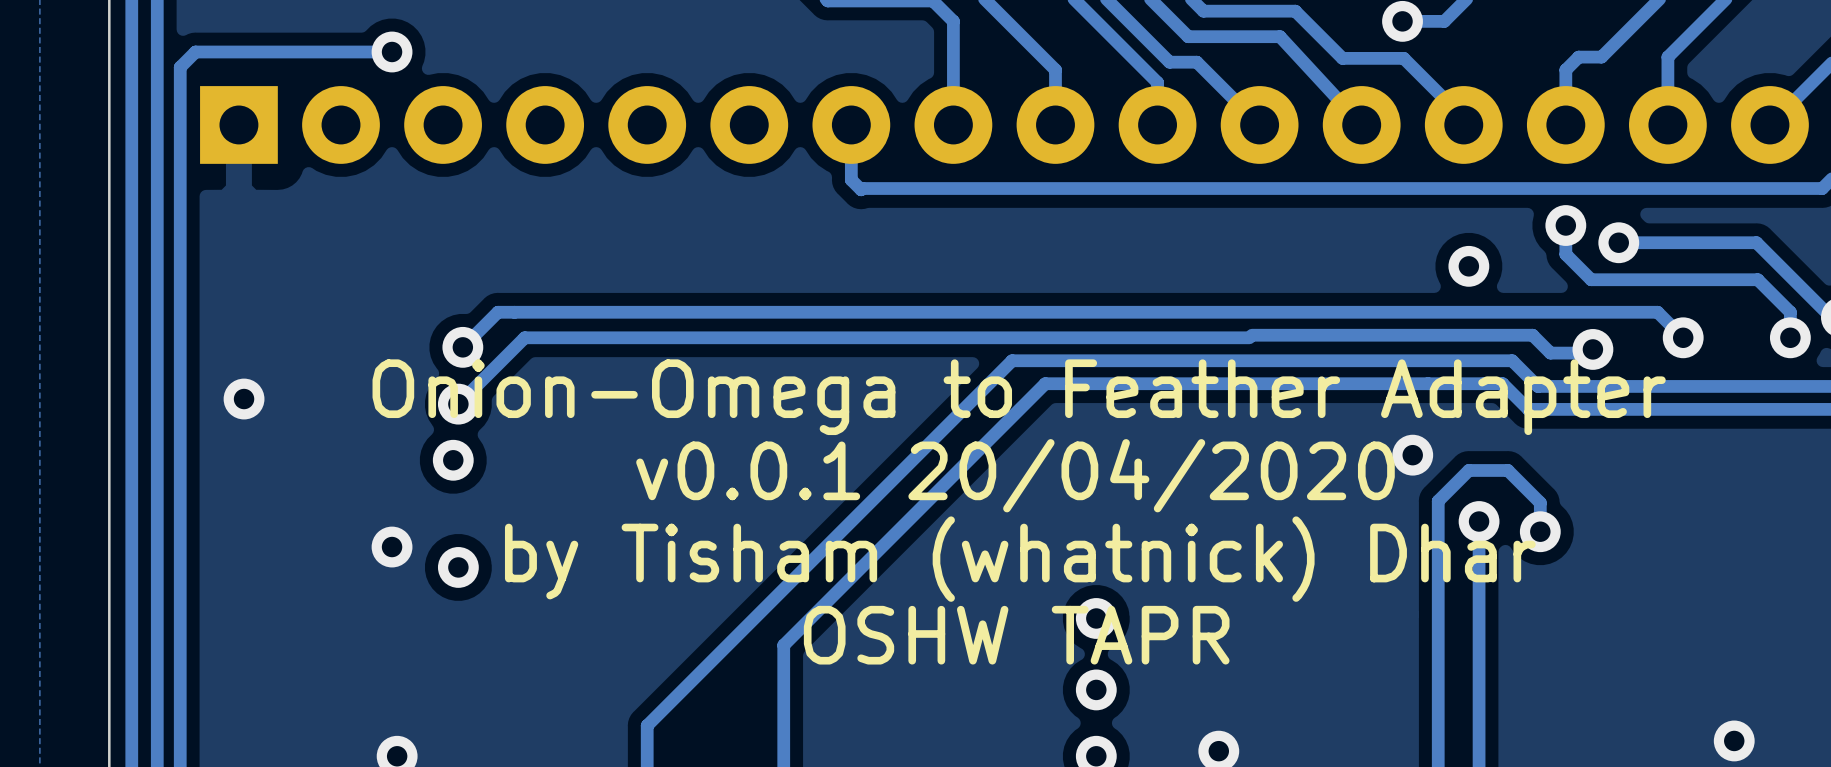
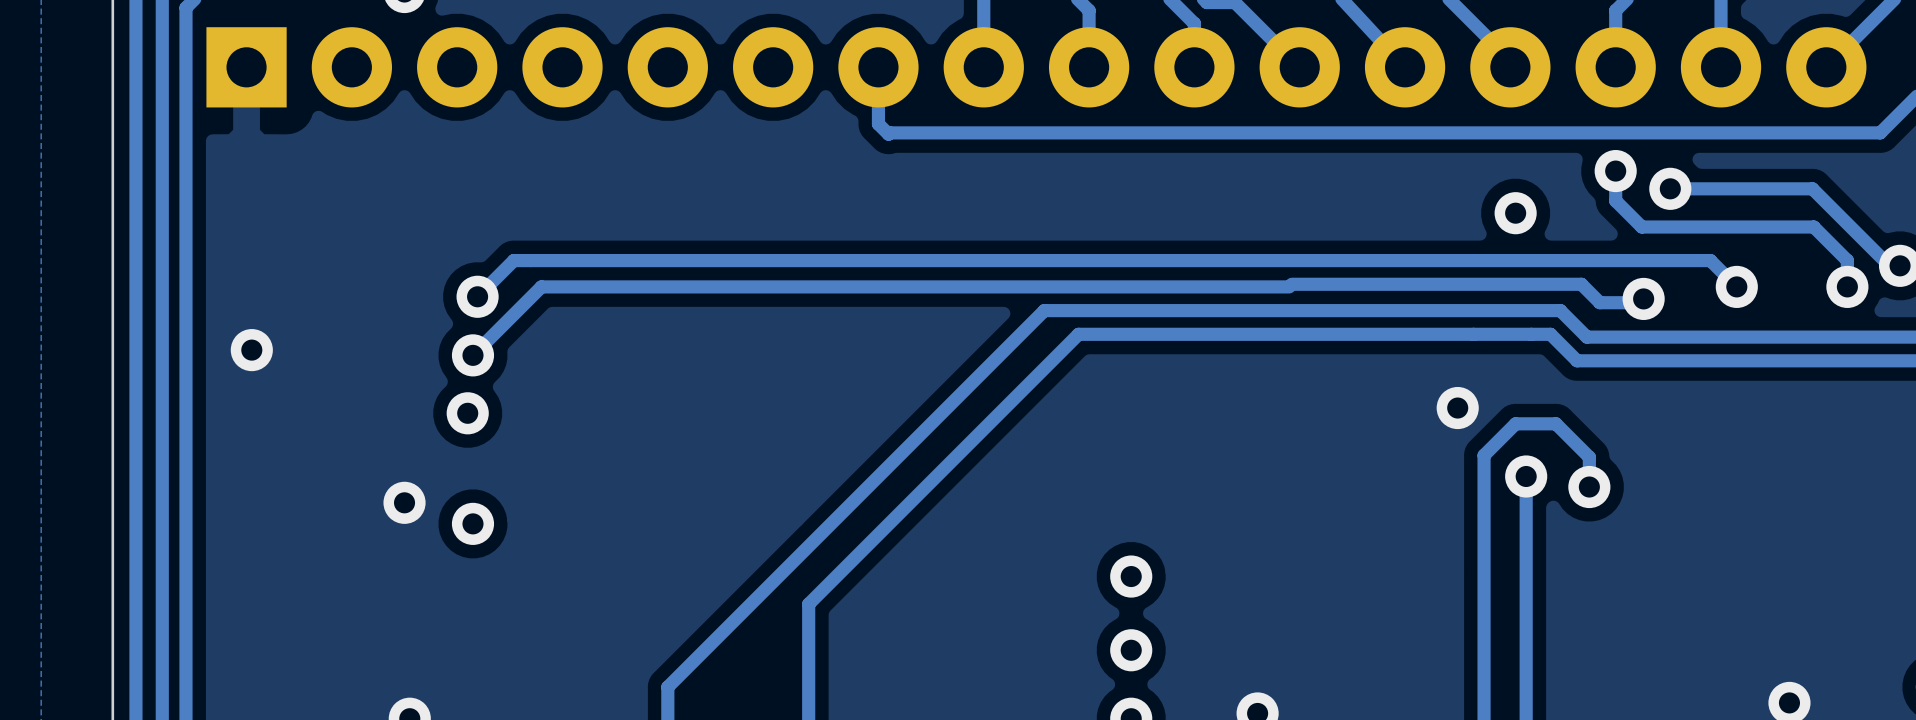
text: Onion-Omega to Feather Adapter (1019, 397) -> none
text: v0.0.1 20/04/2020 (1015, 475) -> none
text: by Tisham (whatnick) Dhar (1020, 559) -> none
text: OSHW TAPR (1016, 635) -> none

